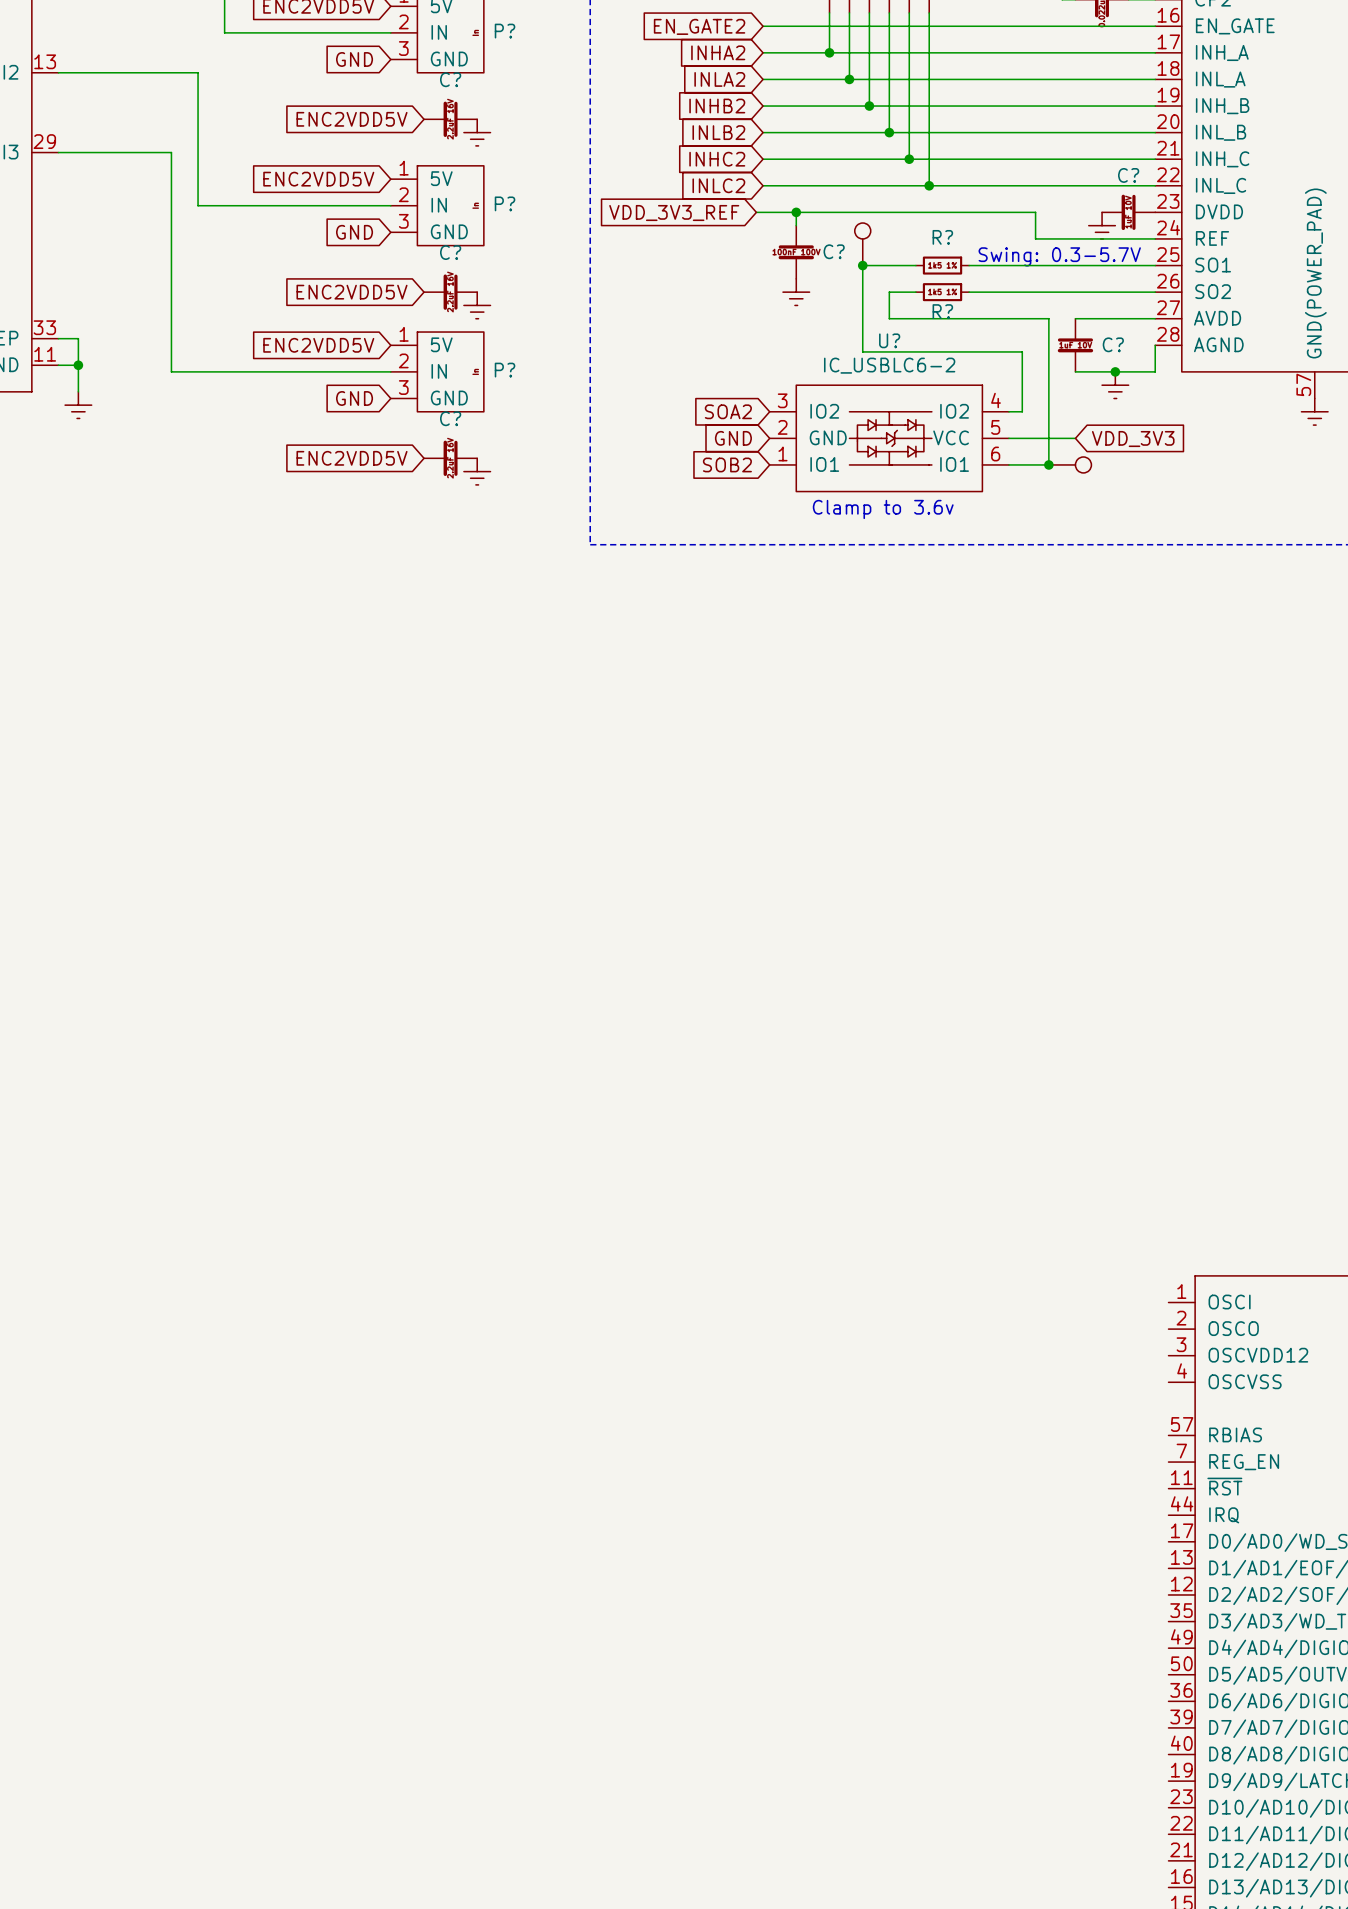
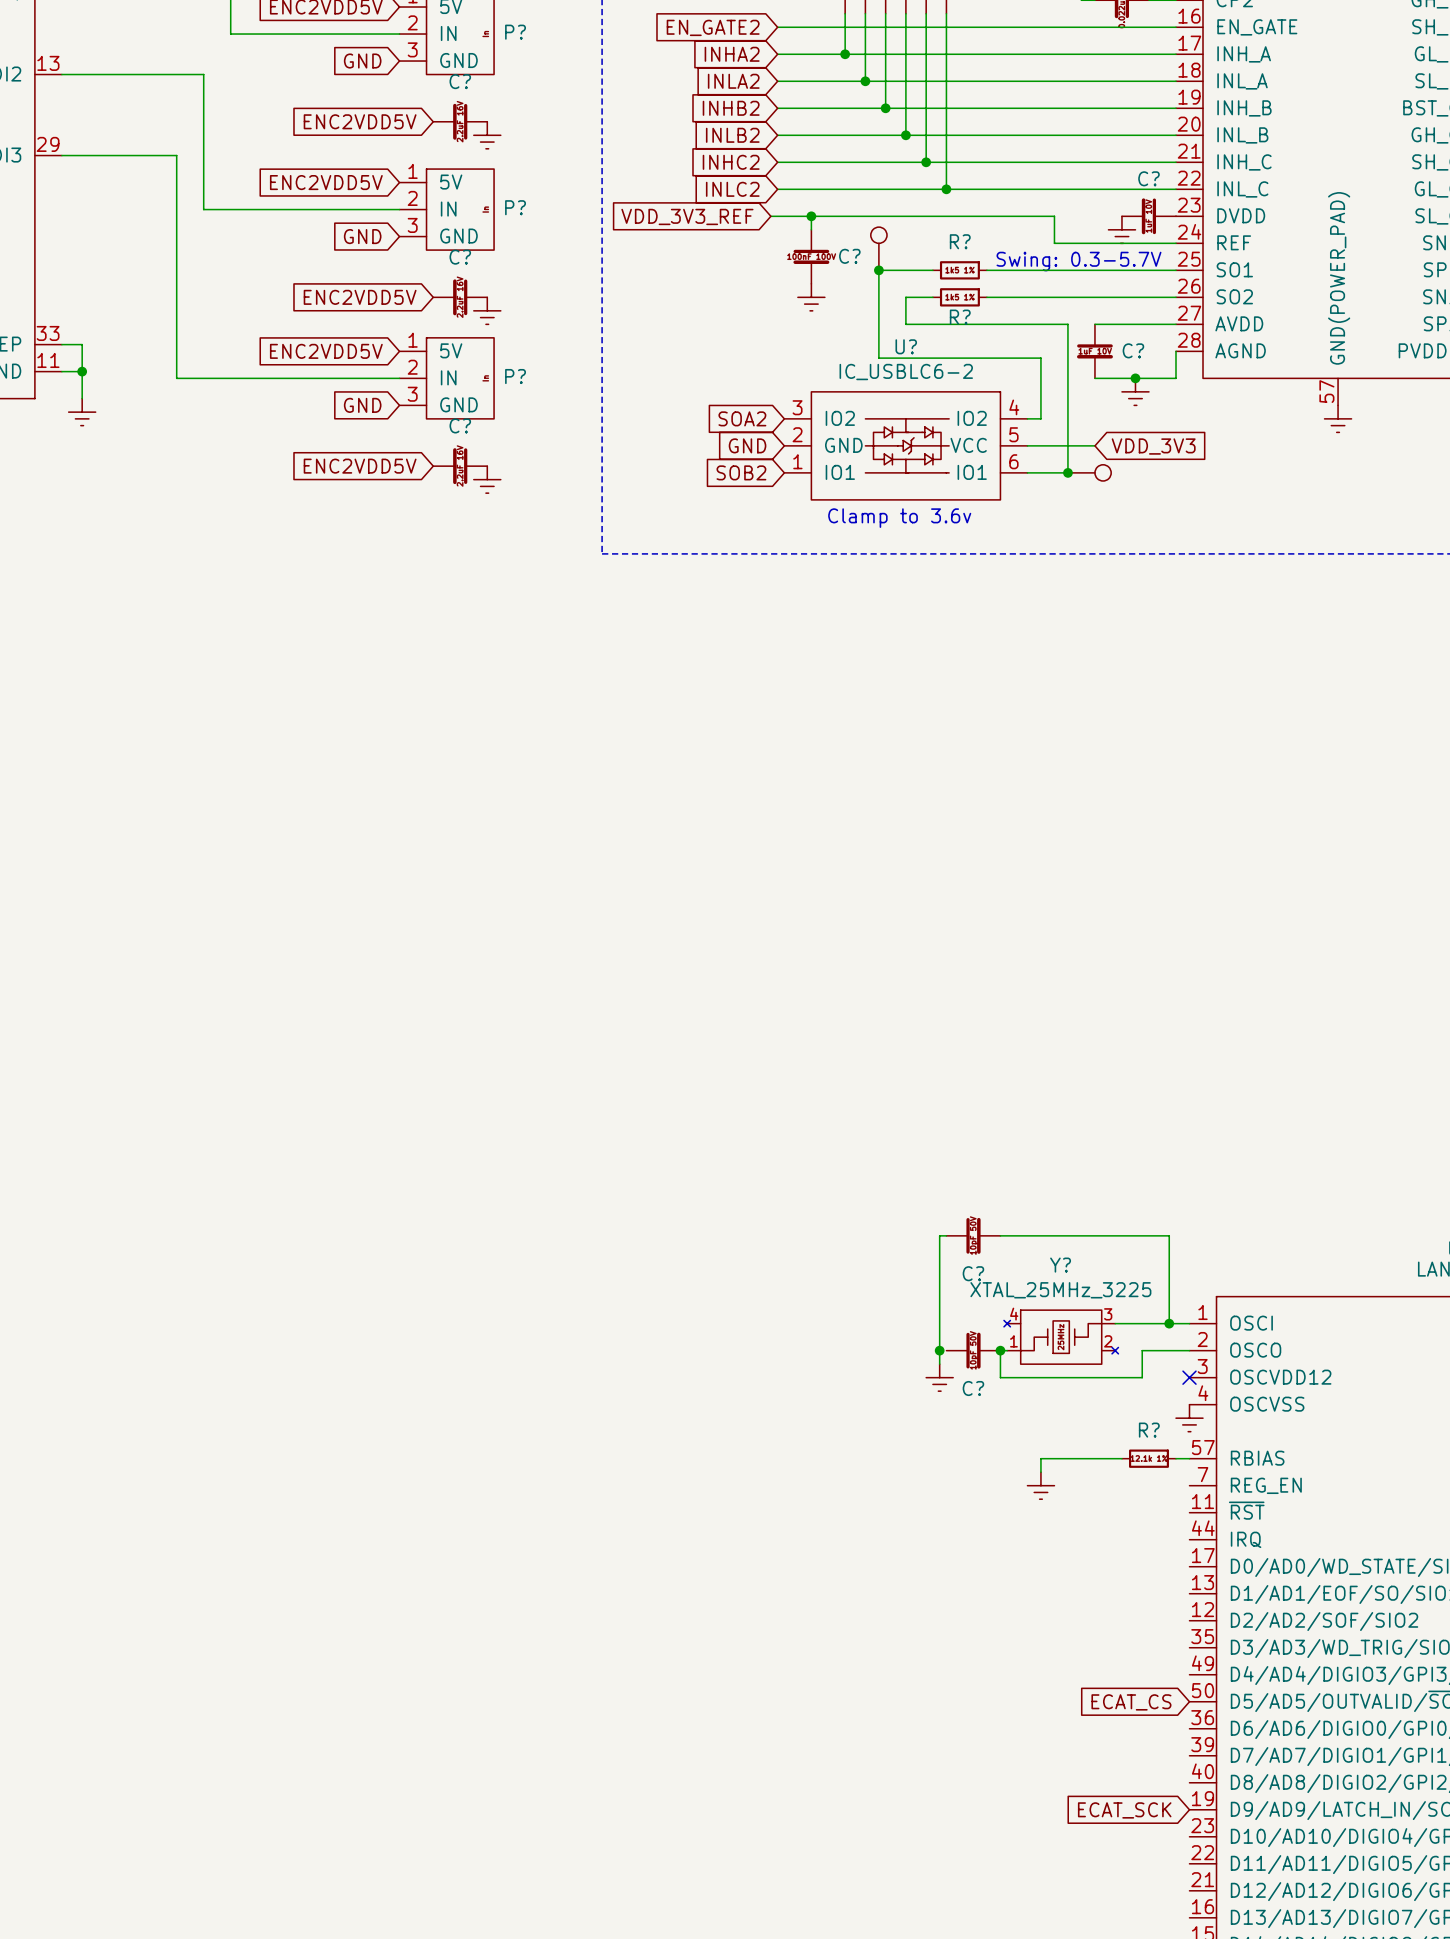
wire: none -> (946, 1235) (939, 1235) (939, 1364)
C?: none -> (973, 1235)
wire: none -> (1000, 1235) (1169, 1235) (1169, 1323)
wire: none -> (1115, 1323) (1189, 1323)
junction: none -> (1169, 1323)
Y?: none -> XTAL_25MHz_3225 (1061, 1337)
junction: none -> (939, 1350)
C?: none -> (973, 1350)
junction: none -> (1000, 1350)
wire: none -> (1007, 1350) (1000, 1350) (1000, 1377) (1142, 1377) (1142, 1350) (1189, 1350)
power symbol: none -> (939, 1377)
no-connect mark: none -> (1189, 1377)
power symbol: none -> (1189, 1418)
wire: none -> (1121, 1458) (1040, 1458) (1040, 1472)
R?: none -> (1148, 1458)
wire: none -> (1175, 1458) (1189, 1458)
power symbol: none -> (1040, 1485)
global label: none -> ECAT_CS (1131, 1702)
global label: none -> ECAT_SCK (1124, 1810)

